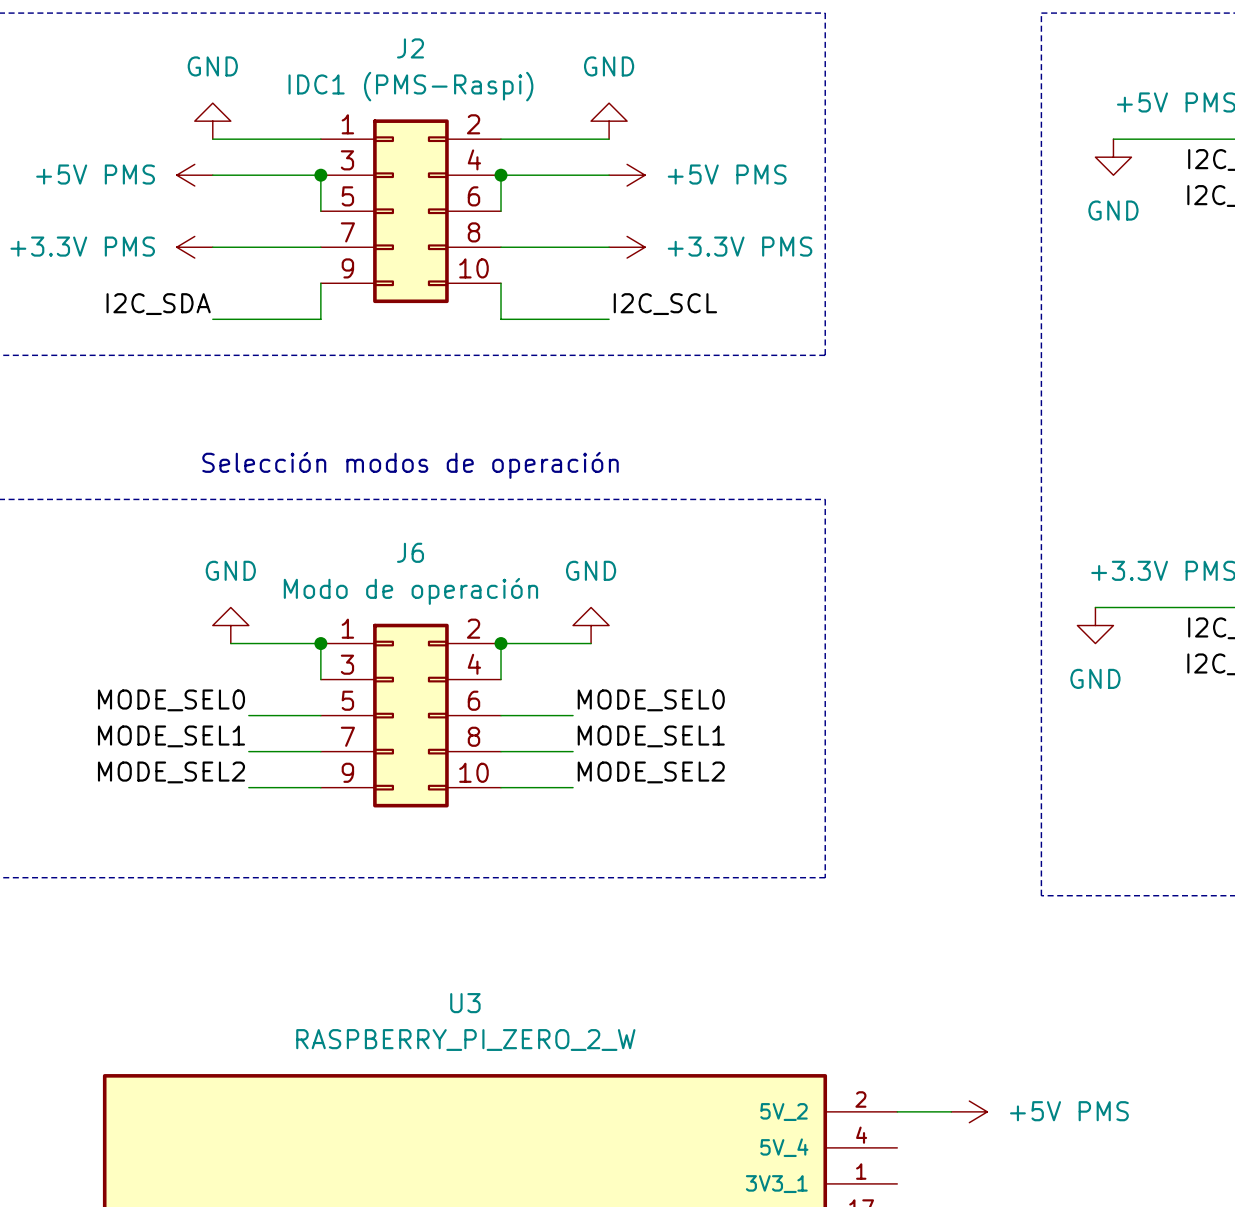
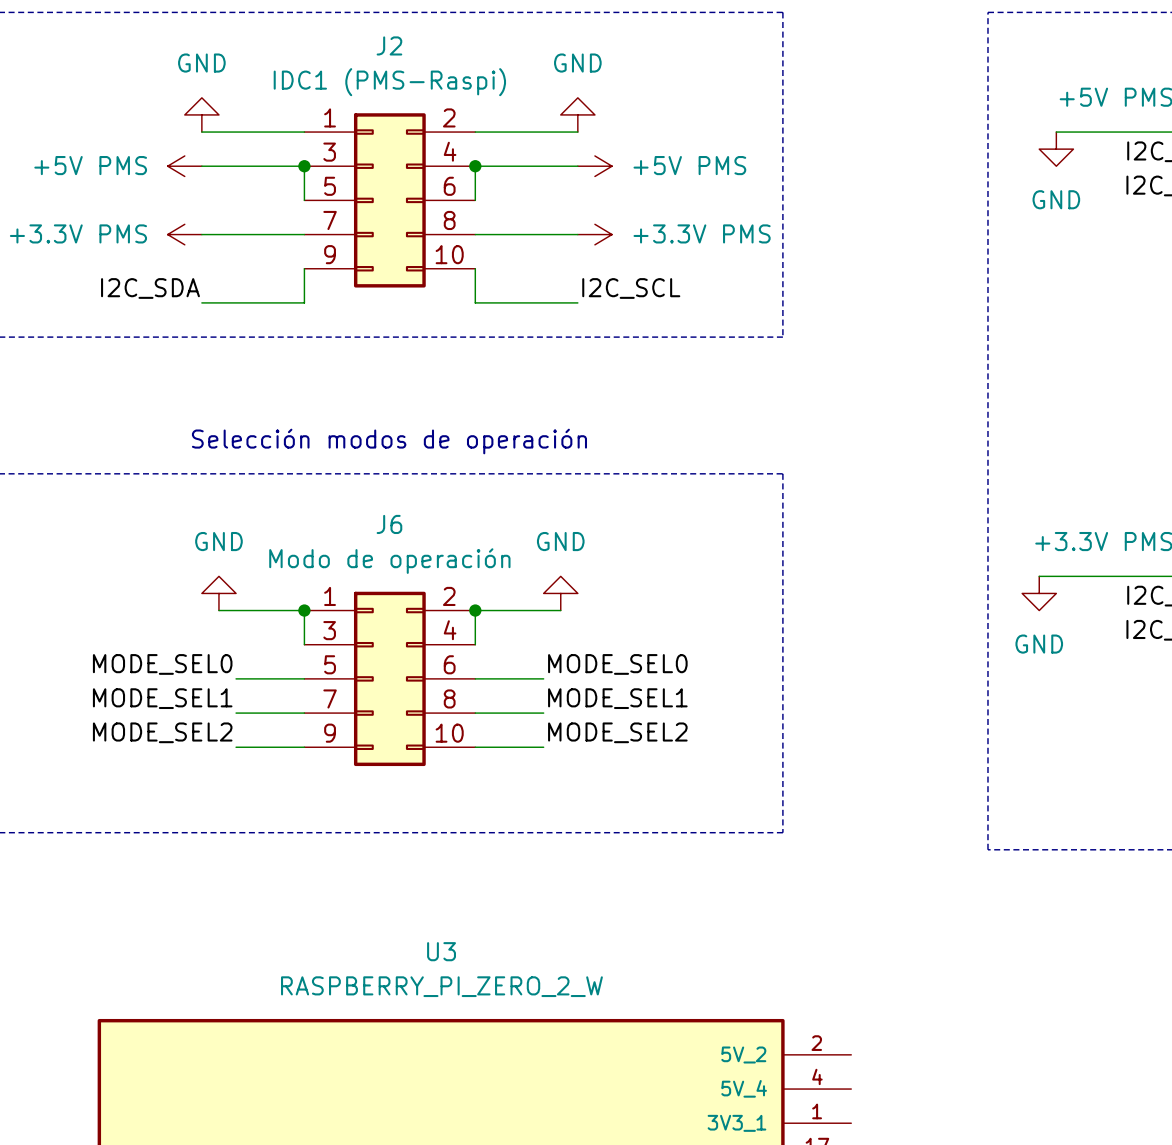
wire: (897, 1111) (951, 1111) -> none
power symbol: +5V PMS (969, 1111) -> none

